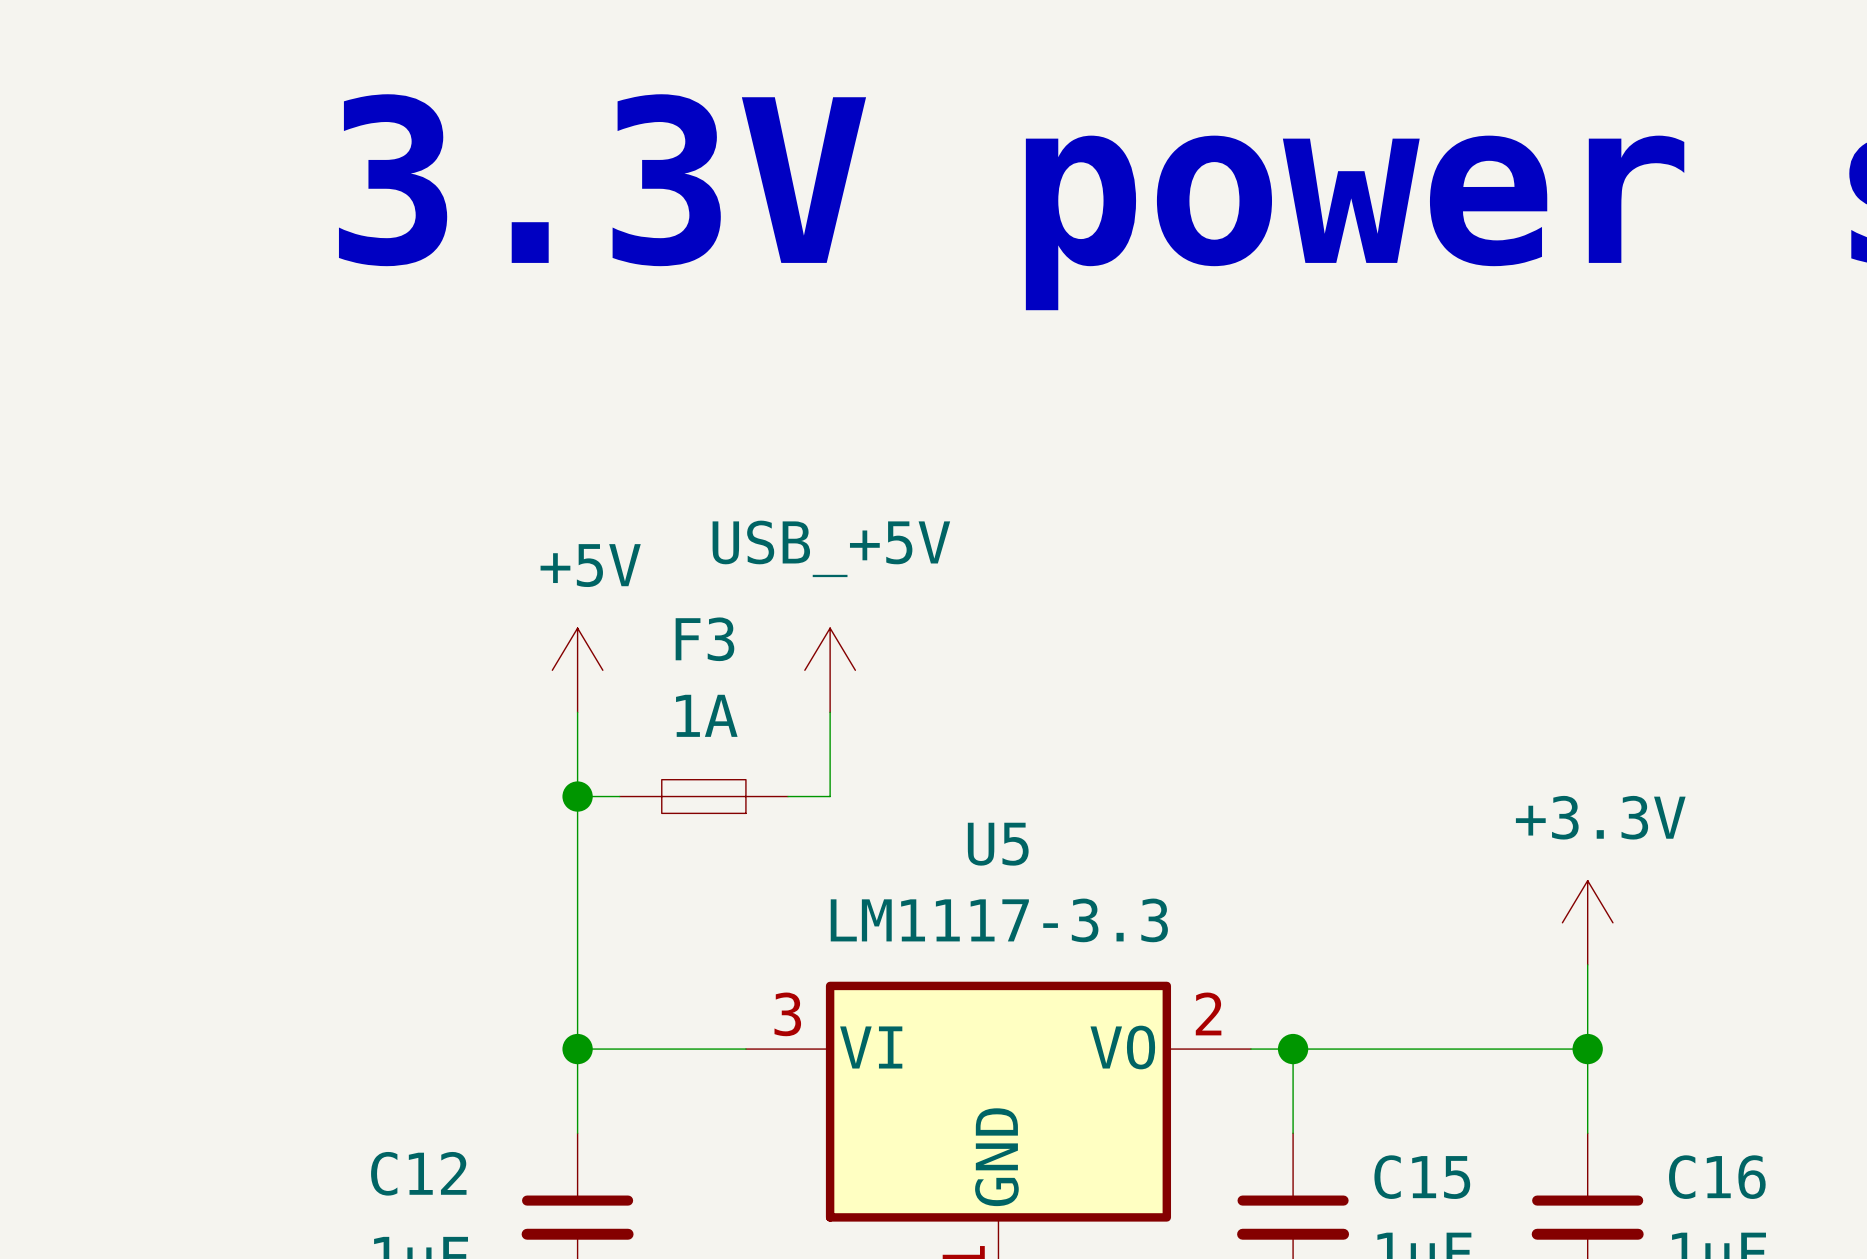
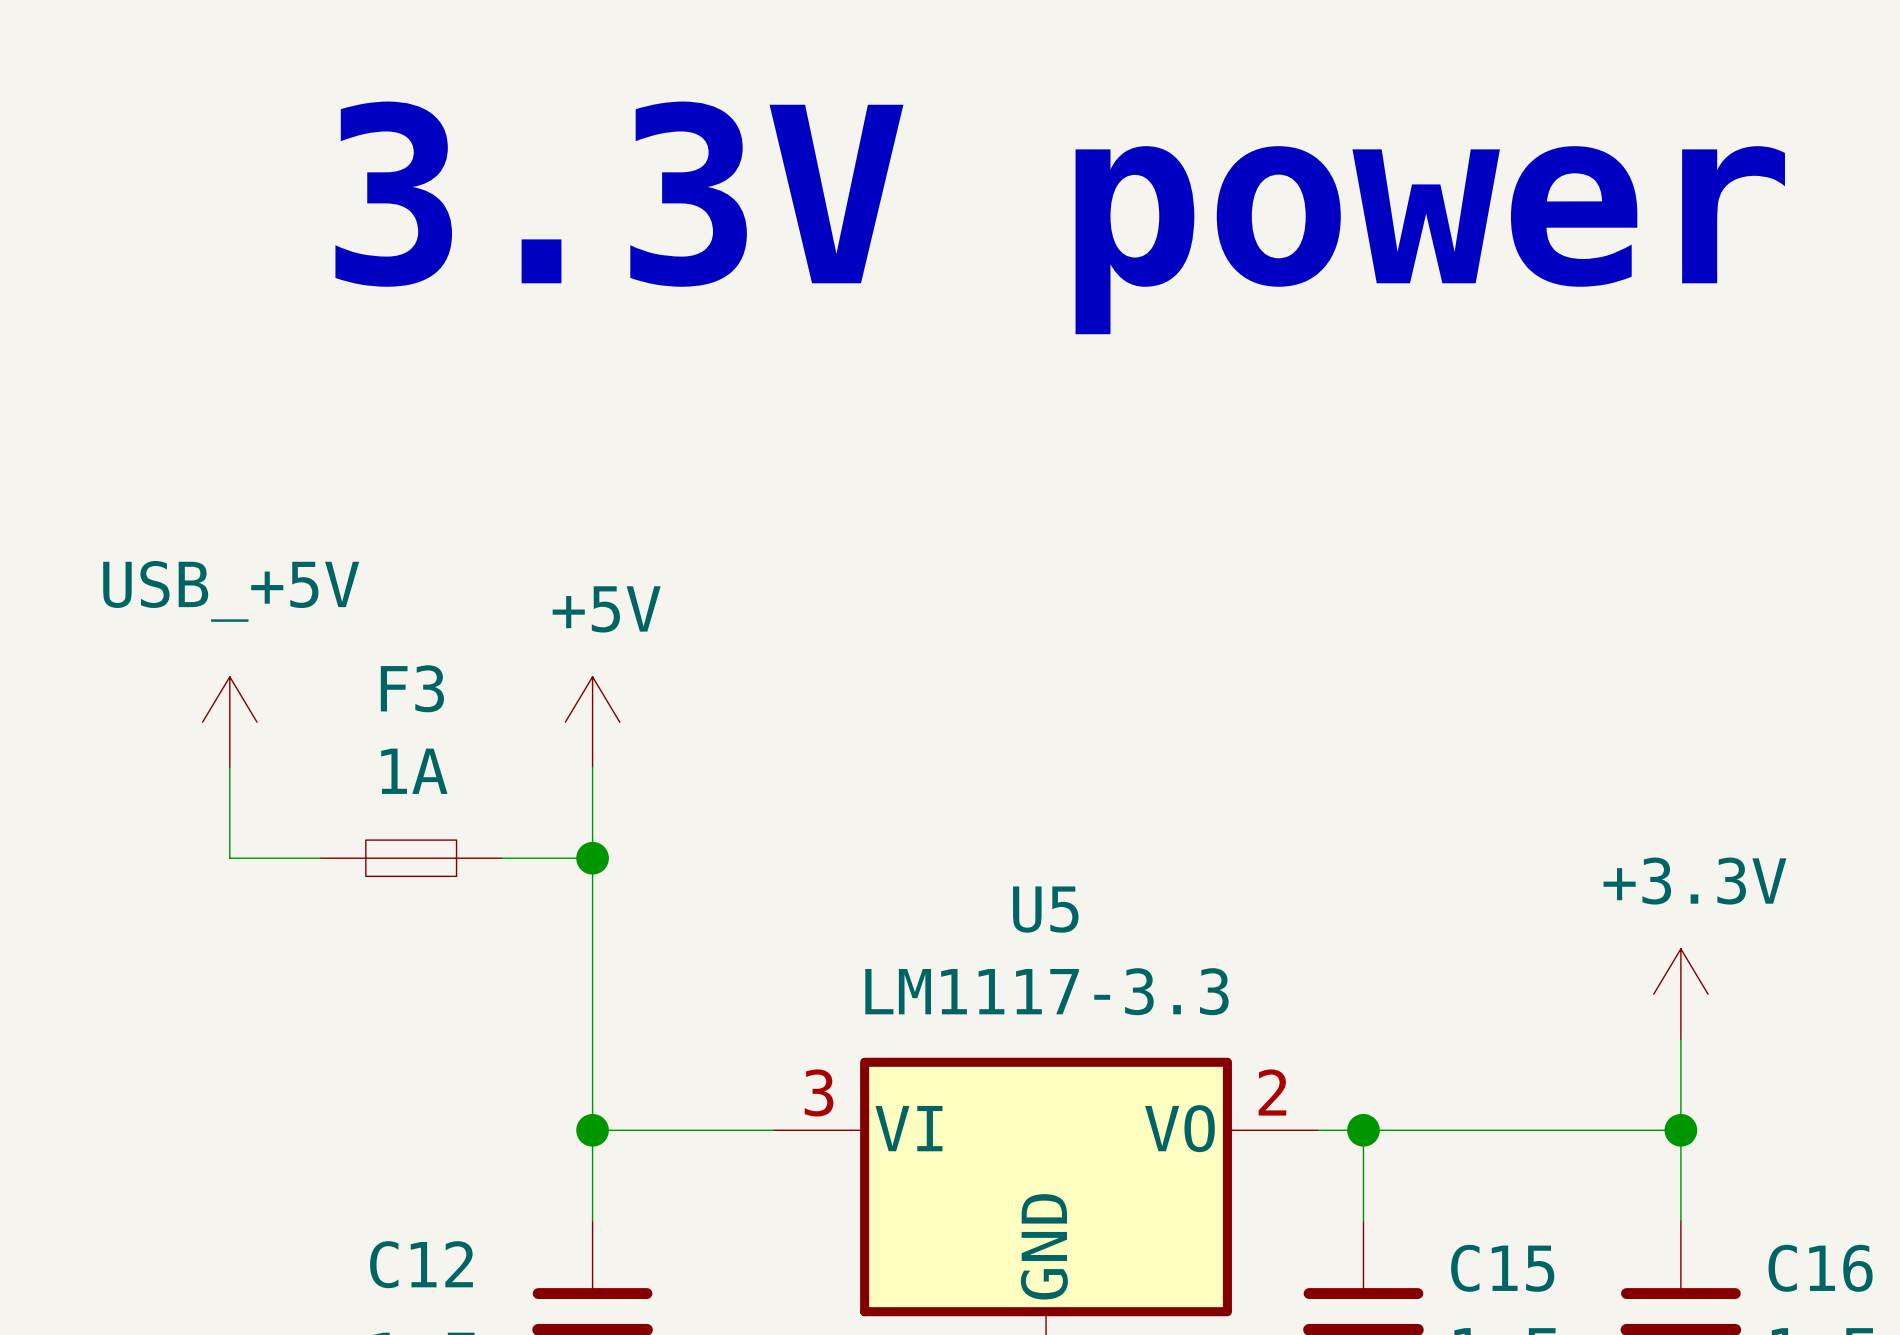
power symbol position: USB_+5V (830, 670) -> USB_+5V (229, 722)
wire: none -> (229, 767) (229, 858) (320, 858)
wire: (830, 712) (830, 796) (788, 796) -> none
wire: (577, 796) (619, 796) -> (592, 858) (501, 858)
F3 position: (703, 796) -> (411, 858)

